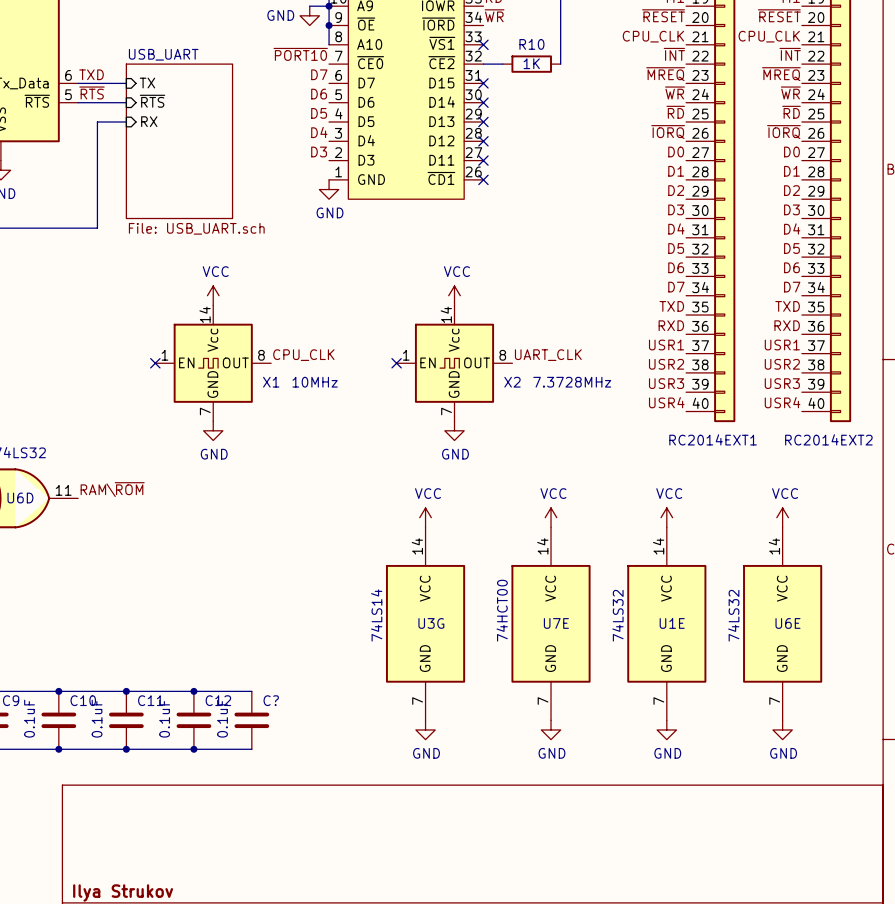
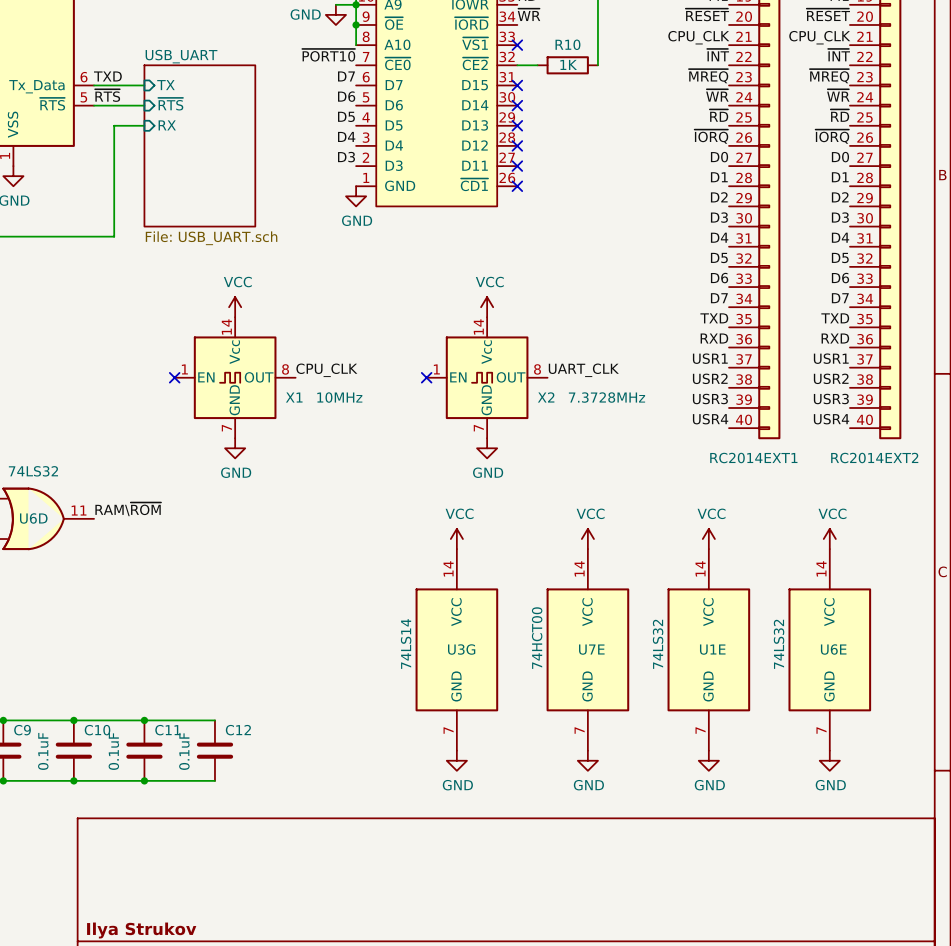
wire: (193, 691) (251, 691) -> none
junction: (193, 691) -> none
C?: 0.1uF (251, 720) -> none
wire: (193, 749) (251, 749) -> none
junction: (193, 749) -> none

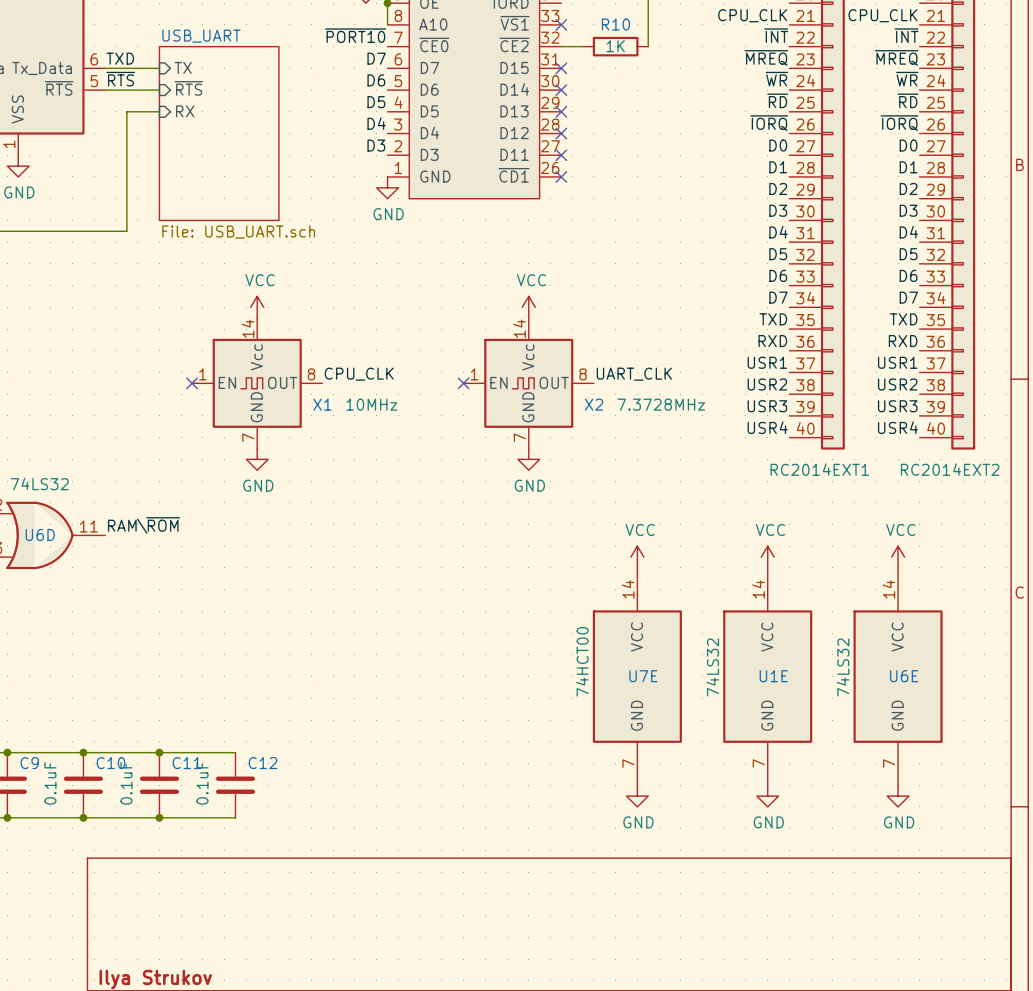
power symbol: VCC (456, 539) -> none
U3G: 74LS14 (456, 649) -> none
power symbol: GND (456, 760) -> none

